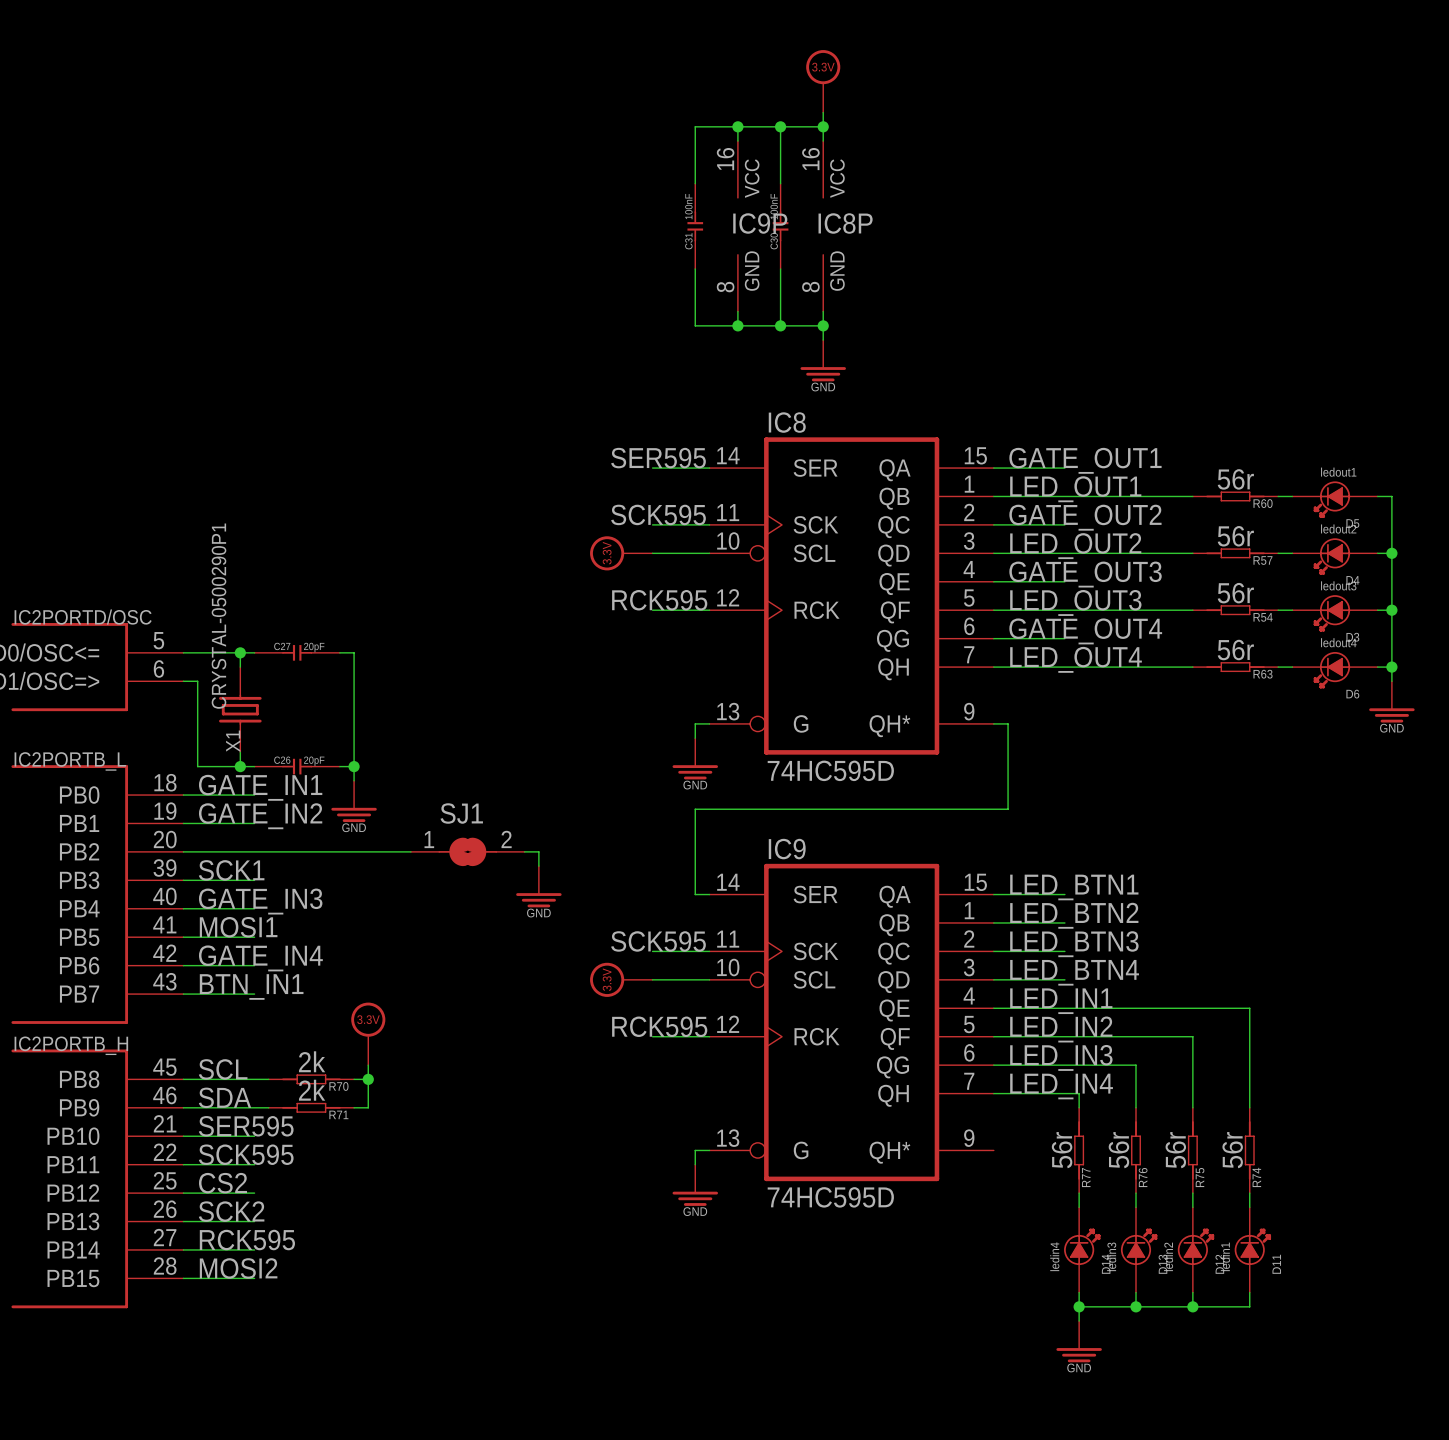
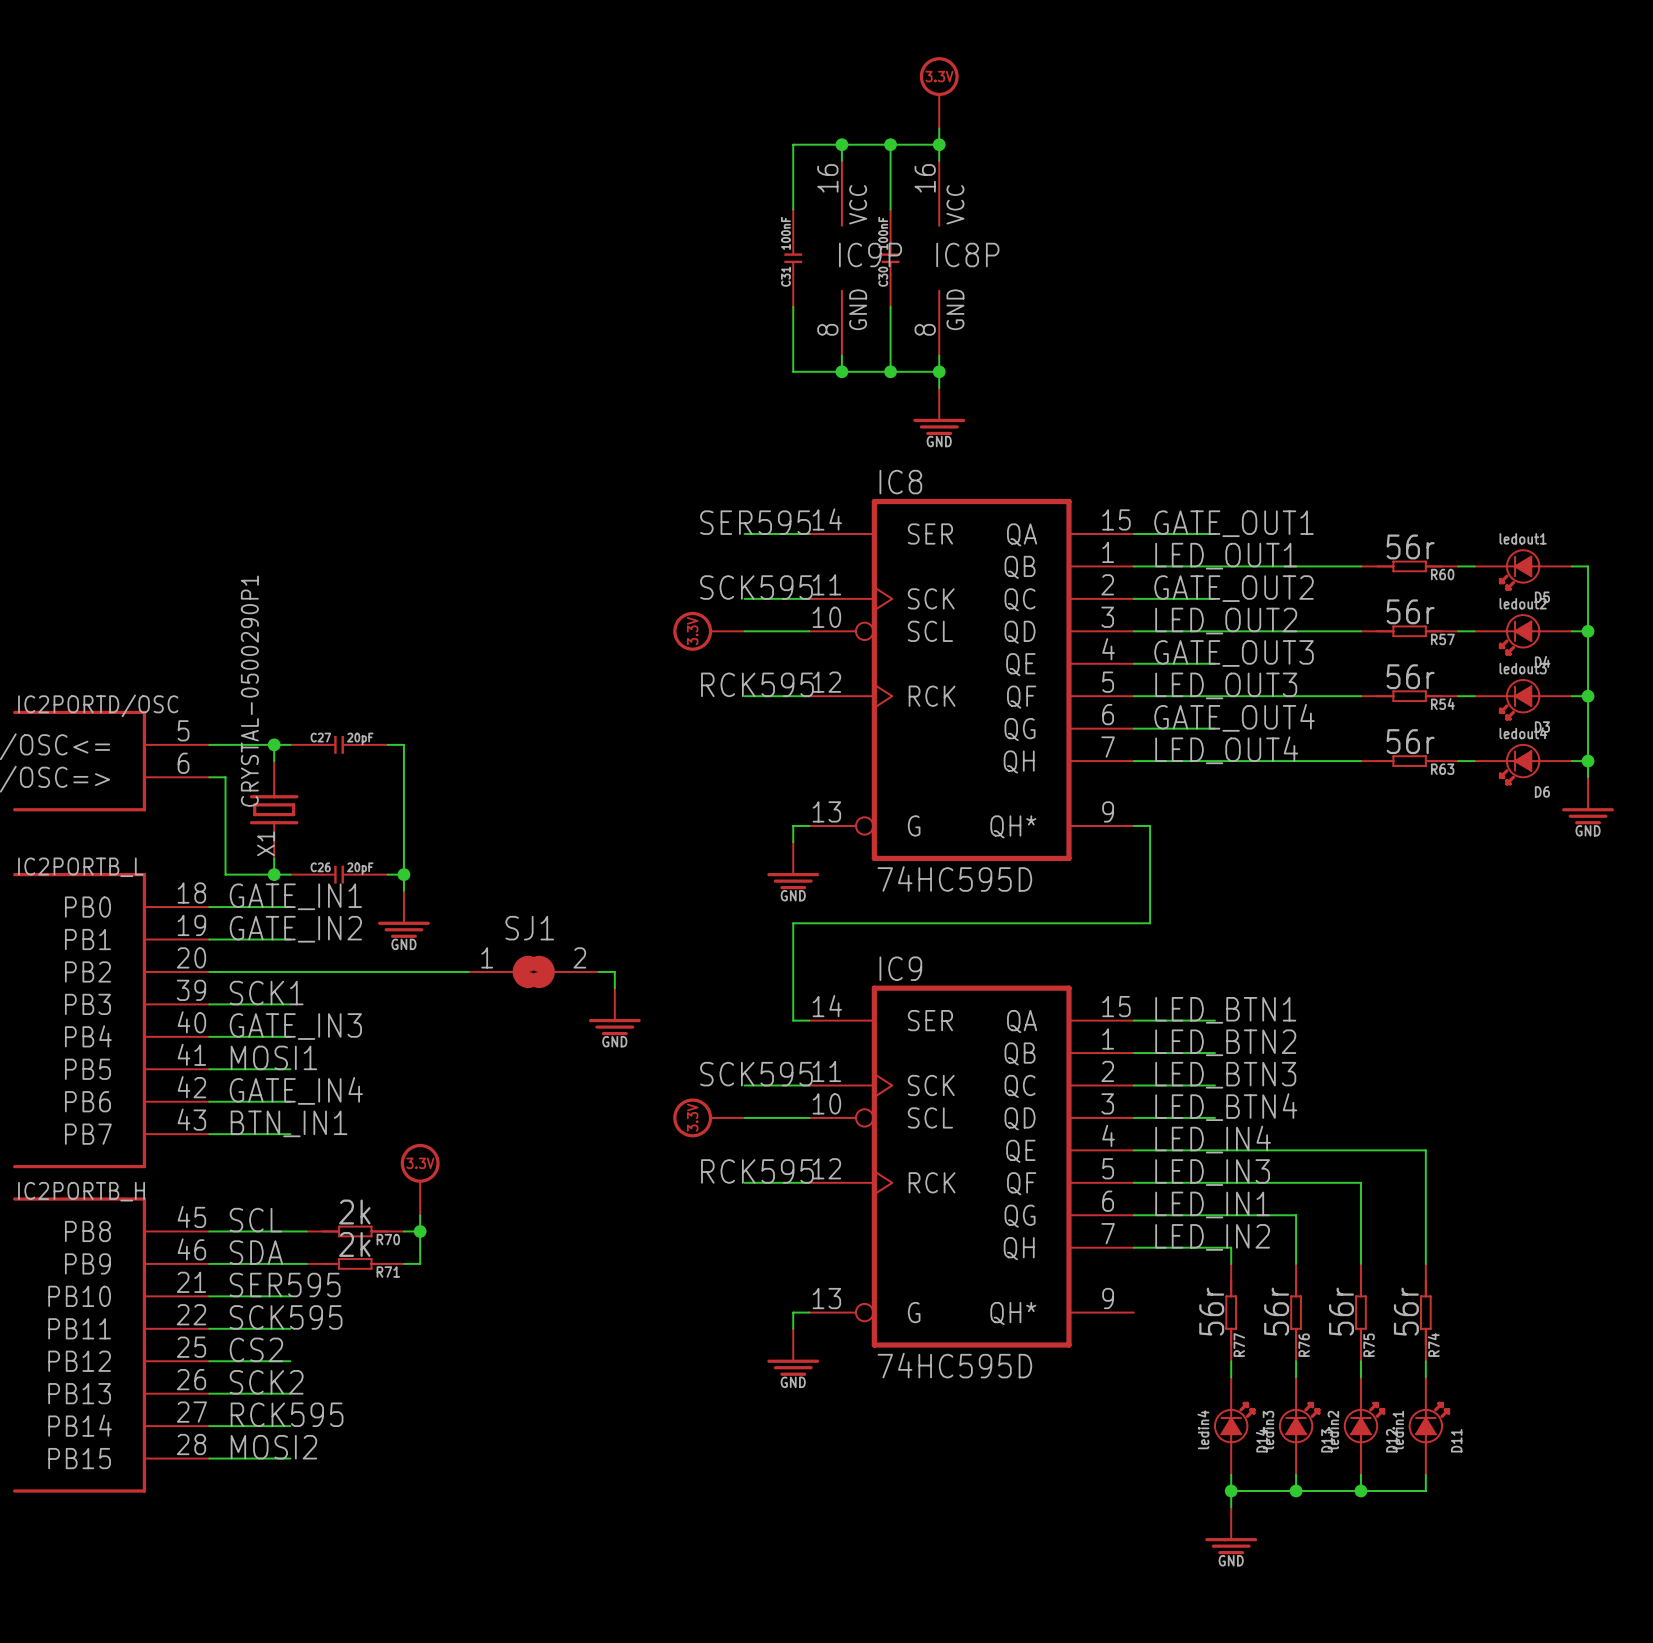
label: LED_IN1 (1061, 1001) -> LED_IN4 (1213, 1139)
label: LED_IN2 (1061, 1029) -> LED_IN3 (1212, 1172)
label: LED_IN3 (1061, 1057) -> LED_IN1 (1212, 1204)
label: LED_IN4 (1061, 1086) -> LED_IN2 (1212, 1237)

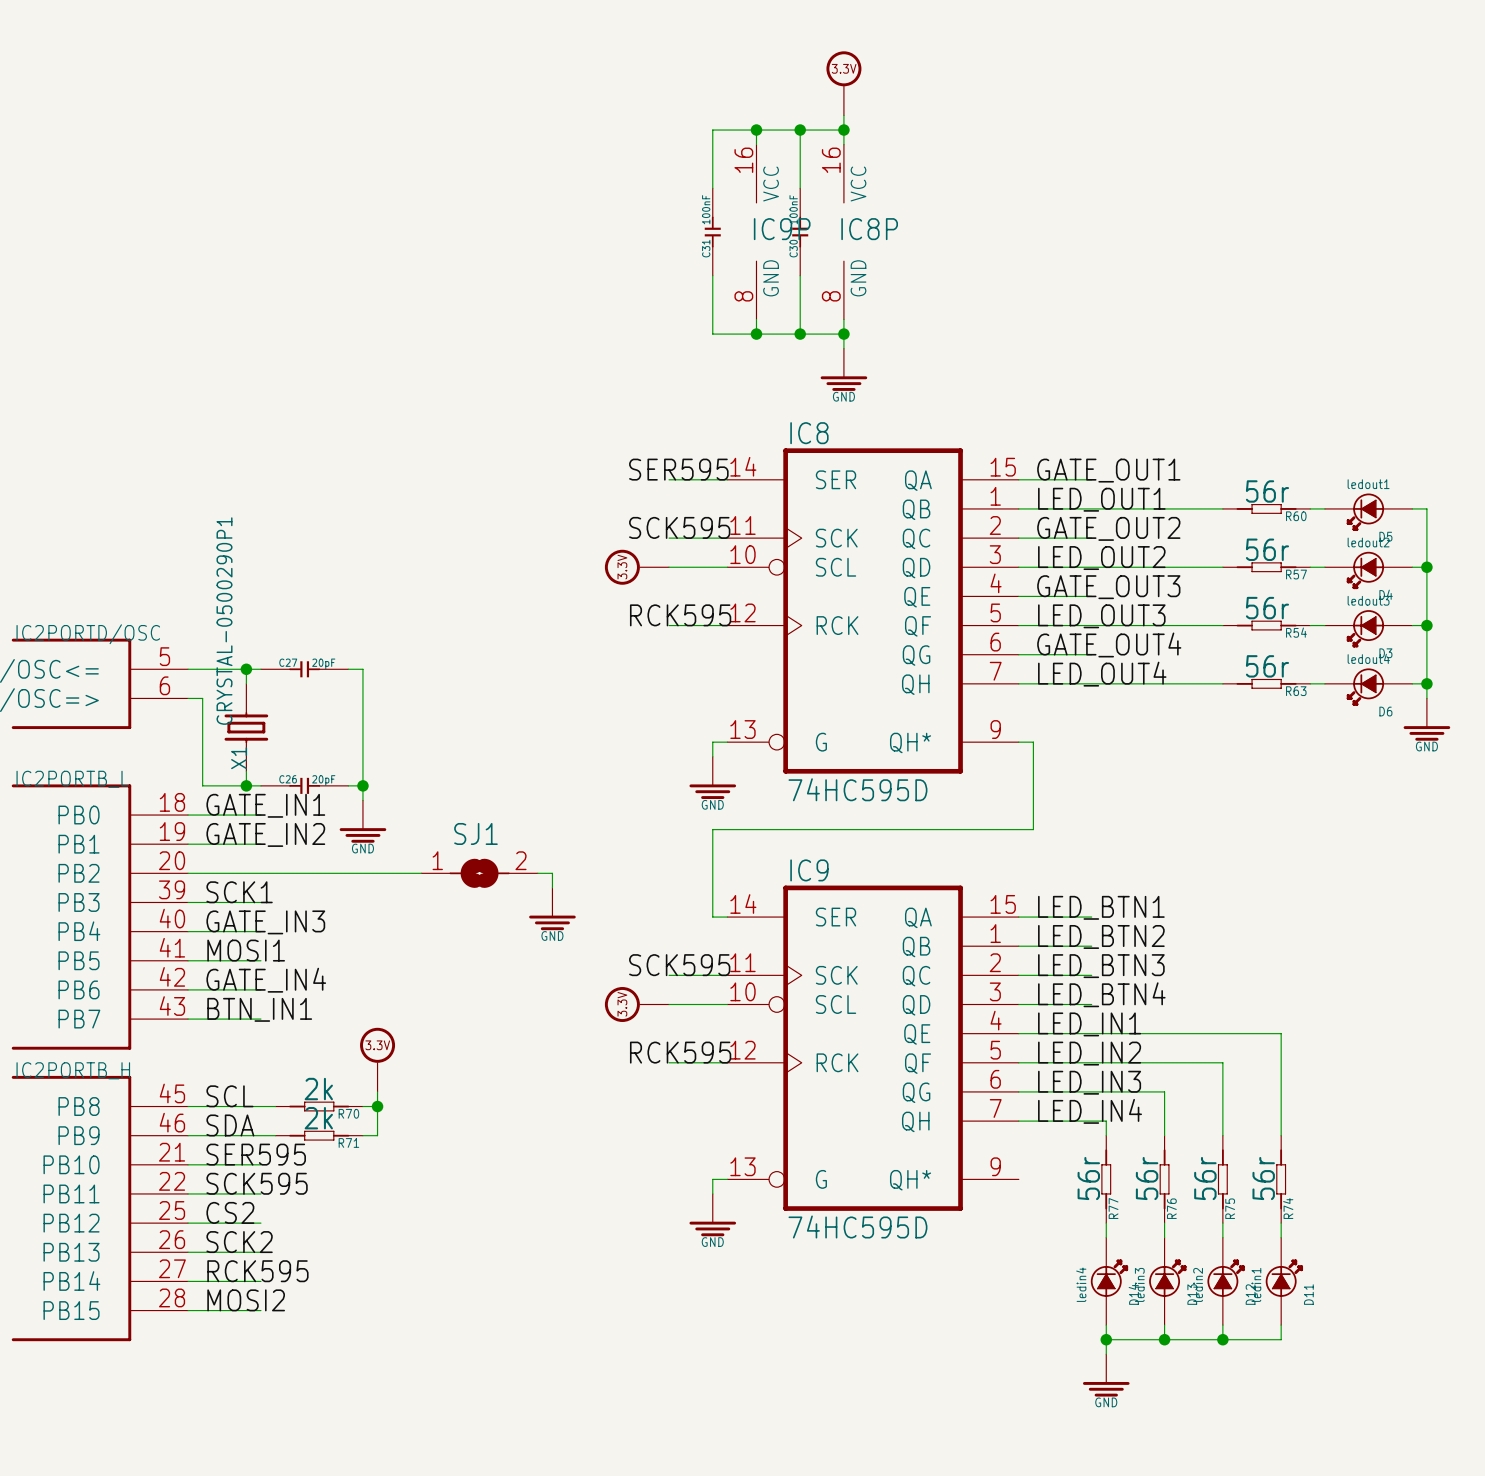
label: LED_IN4 (1213, 1139) -> LED_IN1 (1089, 1024)
label: LED_IN3 (1212, 1172) -> LED_IN2 (1089, 1053)
label: LED_IN1 (1212, 1204) -> LED_IN3 (1089, 1082)
label: LED_IN2 (1212, 1237) -> LED_IN4 (1090, 1111)

